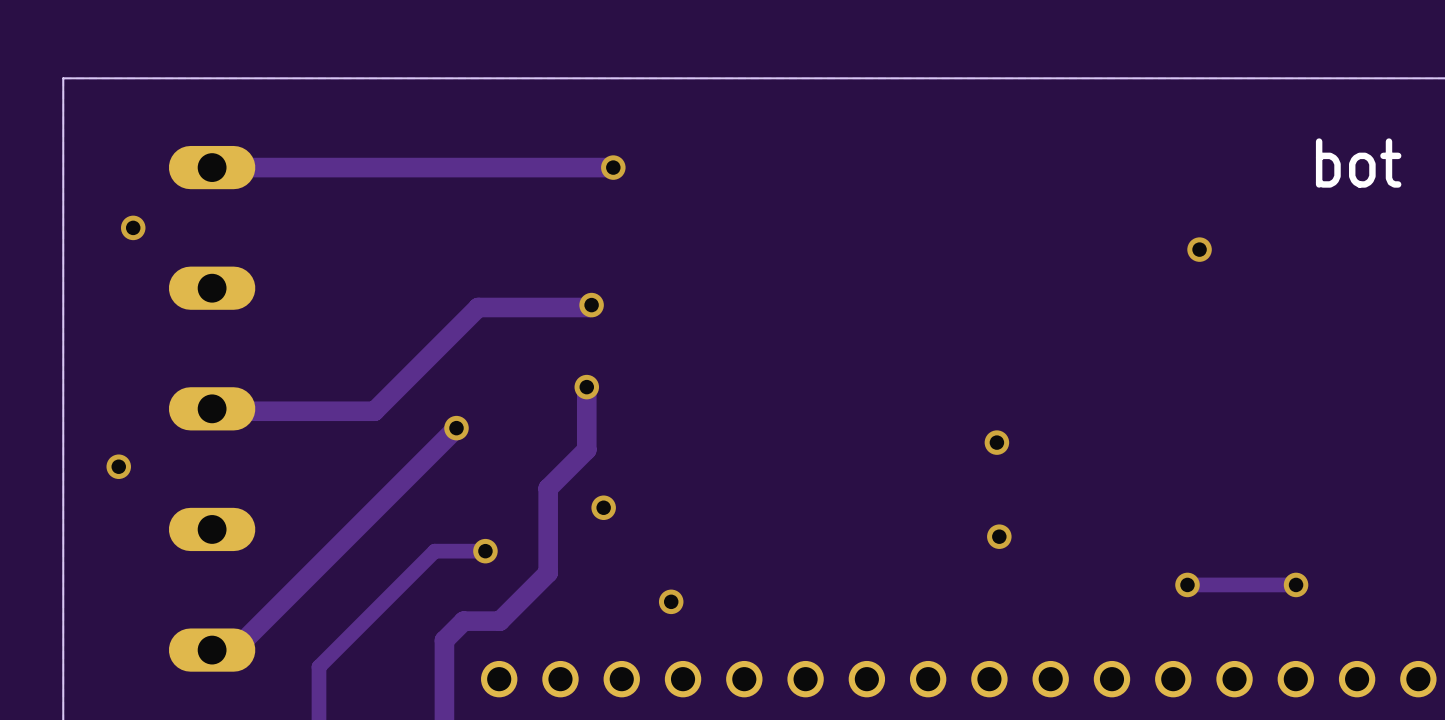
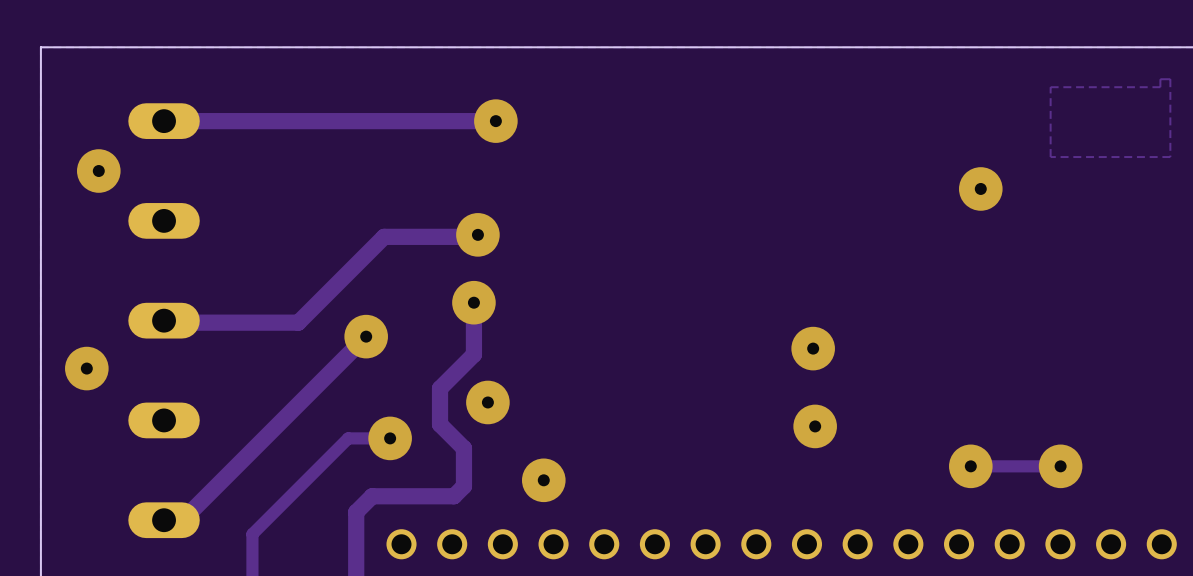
zone outline: none -> (1170, 79) (1170, 157) (1050, 157) (1050, 87) (1160, 87) (1160, 79) (1170, 79)
via size: [601, 155, 626, 180] -> [474, 99, 518, 143]
text: bot (1358, 163) -> none
via size: [120, 215, 146, 241] -> [77, 149, 121, 193]
via size: [1187, 237, 1212, 262] -> [958, 167, 1003, 211]
via size: [579, 292, 604, 318] -> [456, 213, 500, 257]
via size: [574, 374, 600, 400] -> [452, 280, 496, 325]
via size: [444, 415, 469, 441] -> [344, 314, 388, 359]
via size: [984, 430, 1010, 455] -> [791, 326, 835, 371]
via size: [106, 454, 132, 479] -> [65, 346, 109, 391]
track: (548, 488) (548, 572) (499, 621) -> (442, 386) (440, 388) (440, 424) (463, 448) (463, 486) (453, 496) (402, 496)
via size: [591, 495, 616, 521] -> [466, 380, 510, 425]
via size: [987, 524, 1012, 549] -> [793, 404, 837, 449]
via size: [473, 538, 498, 564] -> [368, 416, 412, 461]
via size: [1175, 572, 1200, 598] -> [949, 444, 993, 489]
via size: [1283, 572, 1309, 598] -> [1038, 444, 1083, 489]
via size: [658, 589, 684, 615] -> [521, 458, 566, 503]

